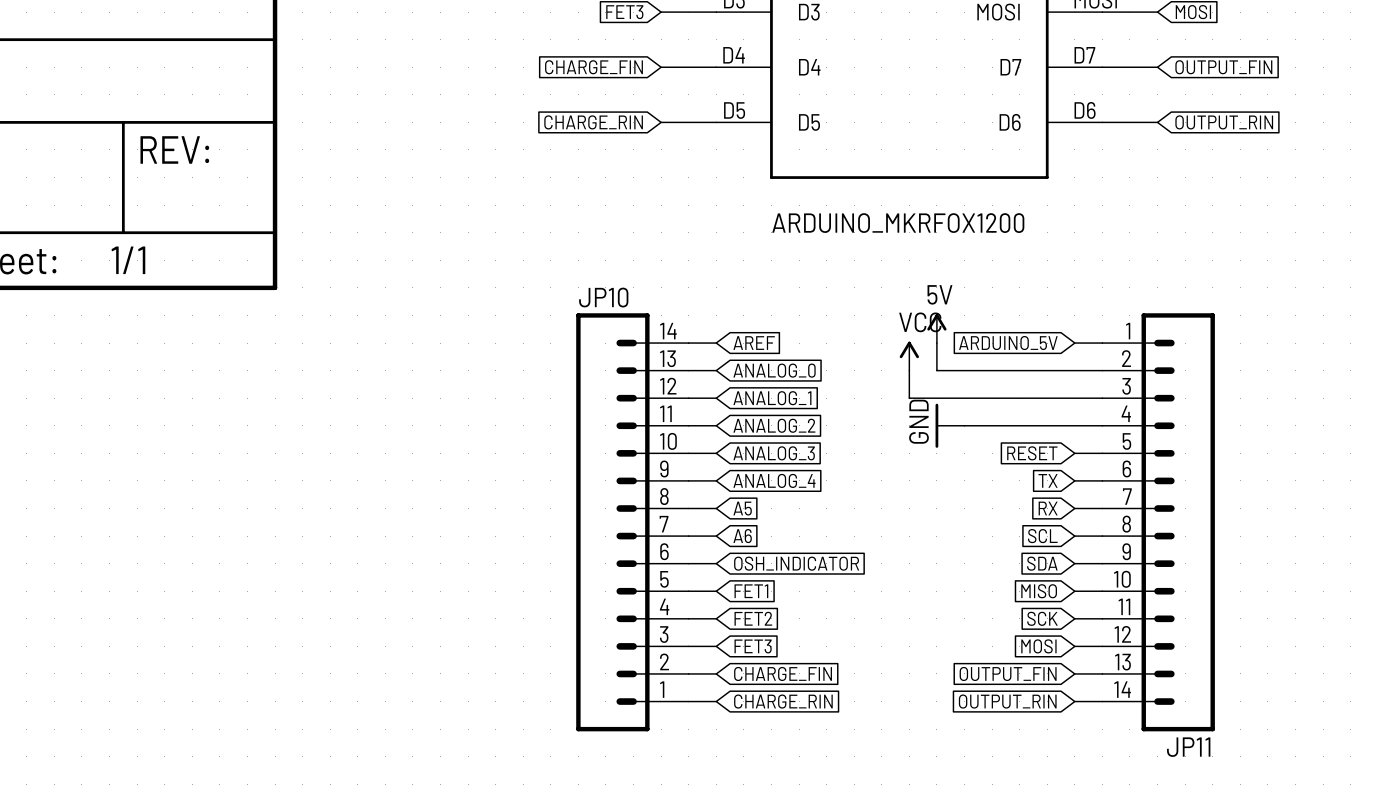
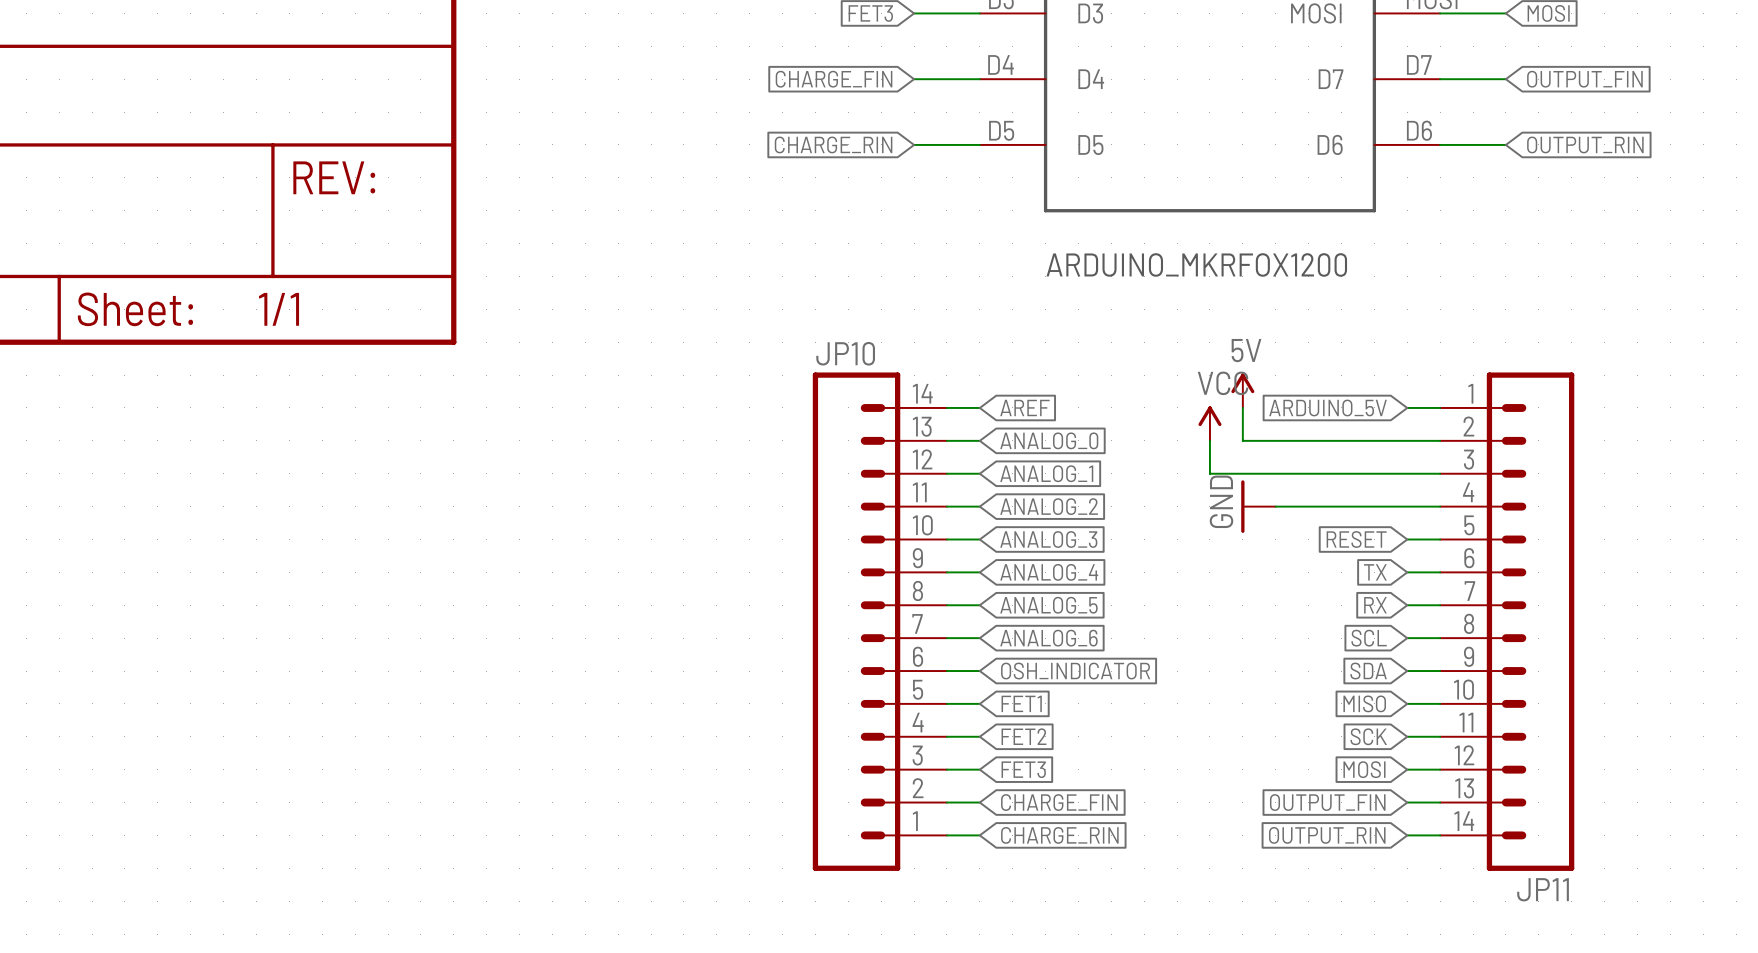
global label: A5 (742, 508) -> ANALOG_5 (1048, 605)
global label: A6 (742, 536) -> ANALOG_6 (1048, 638)

